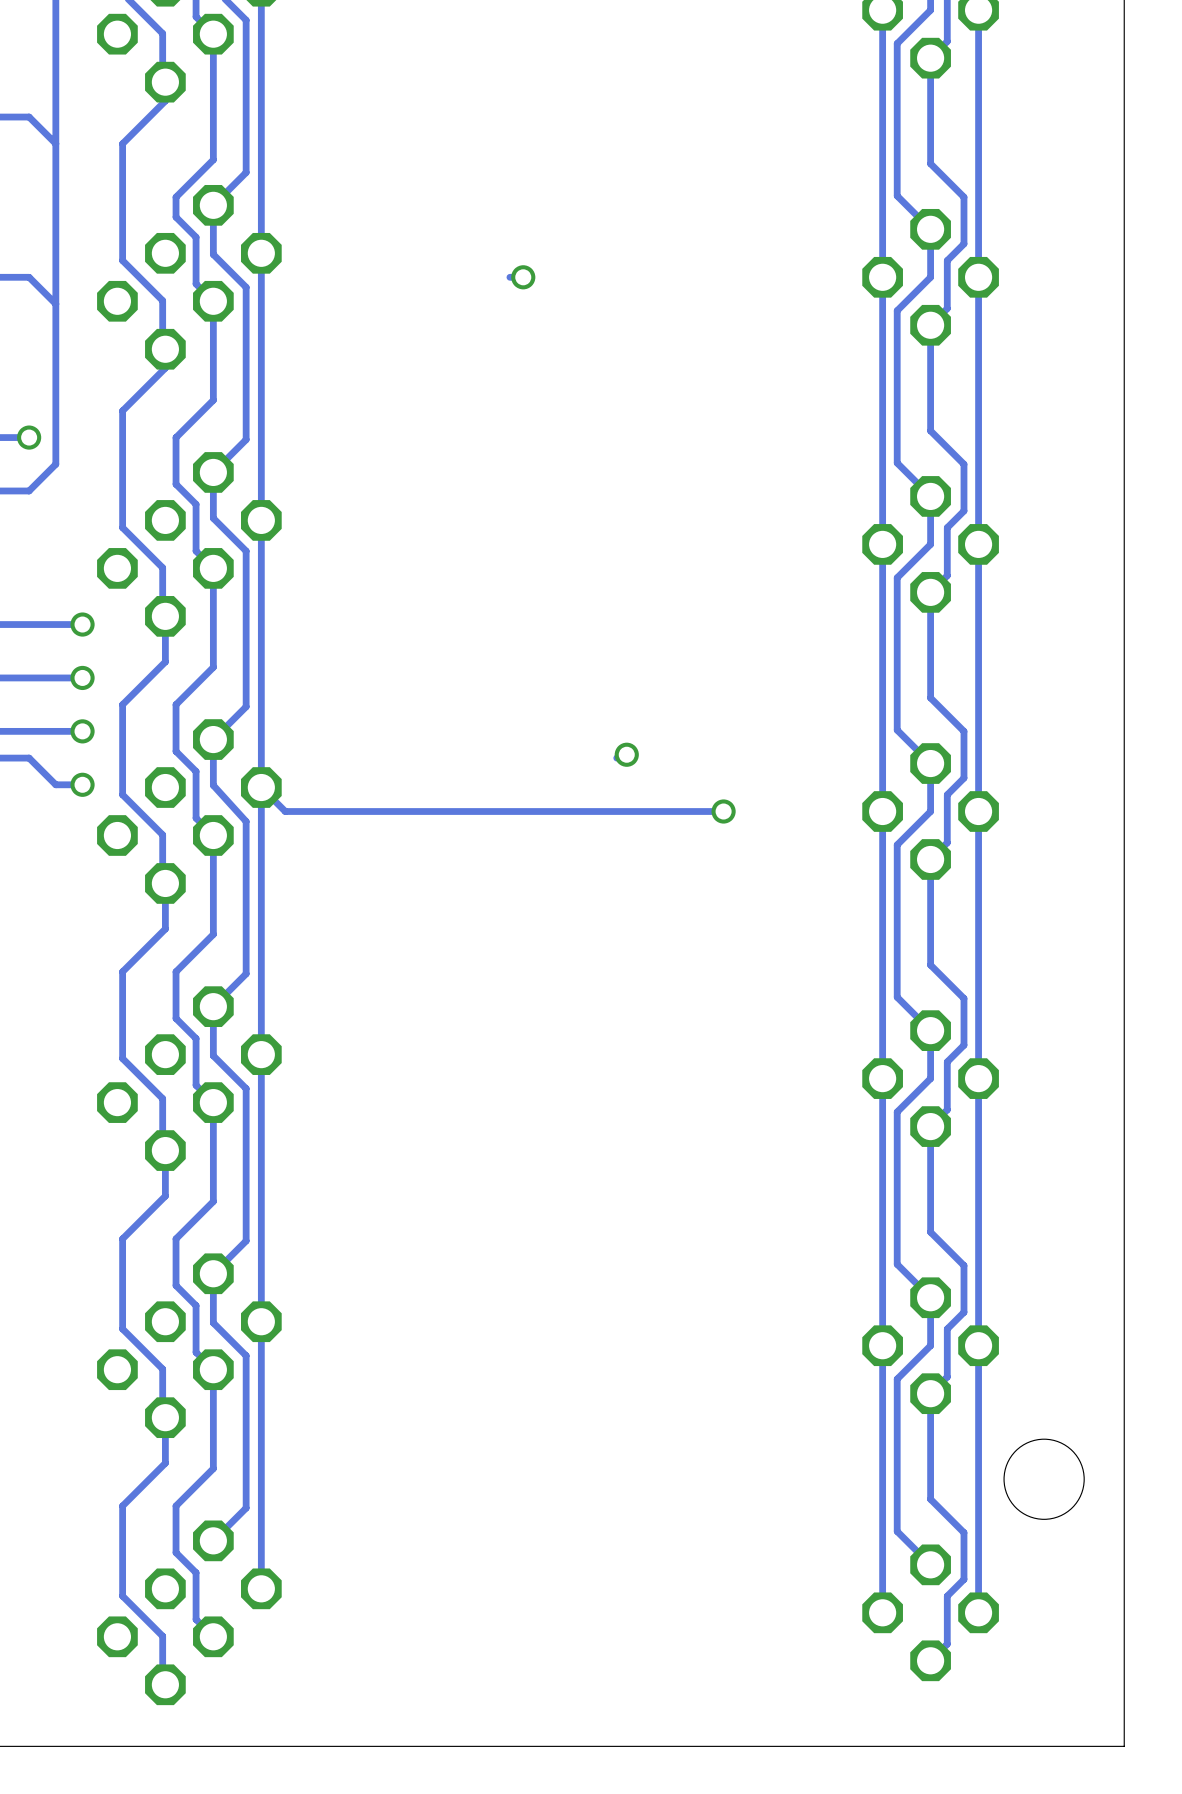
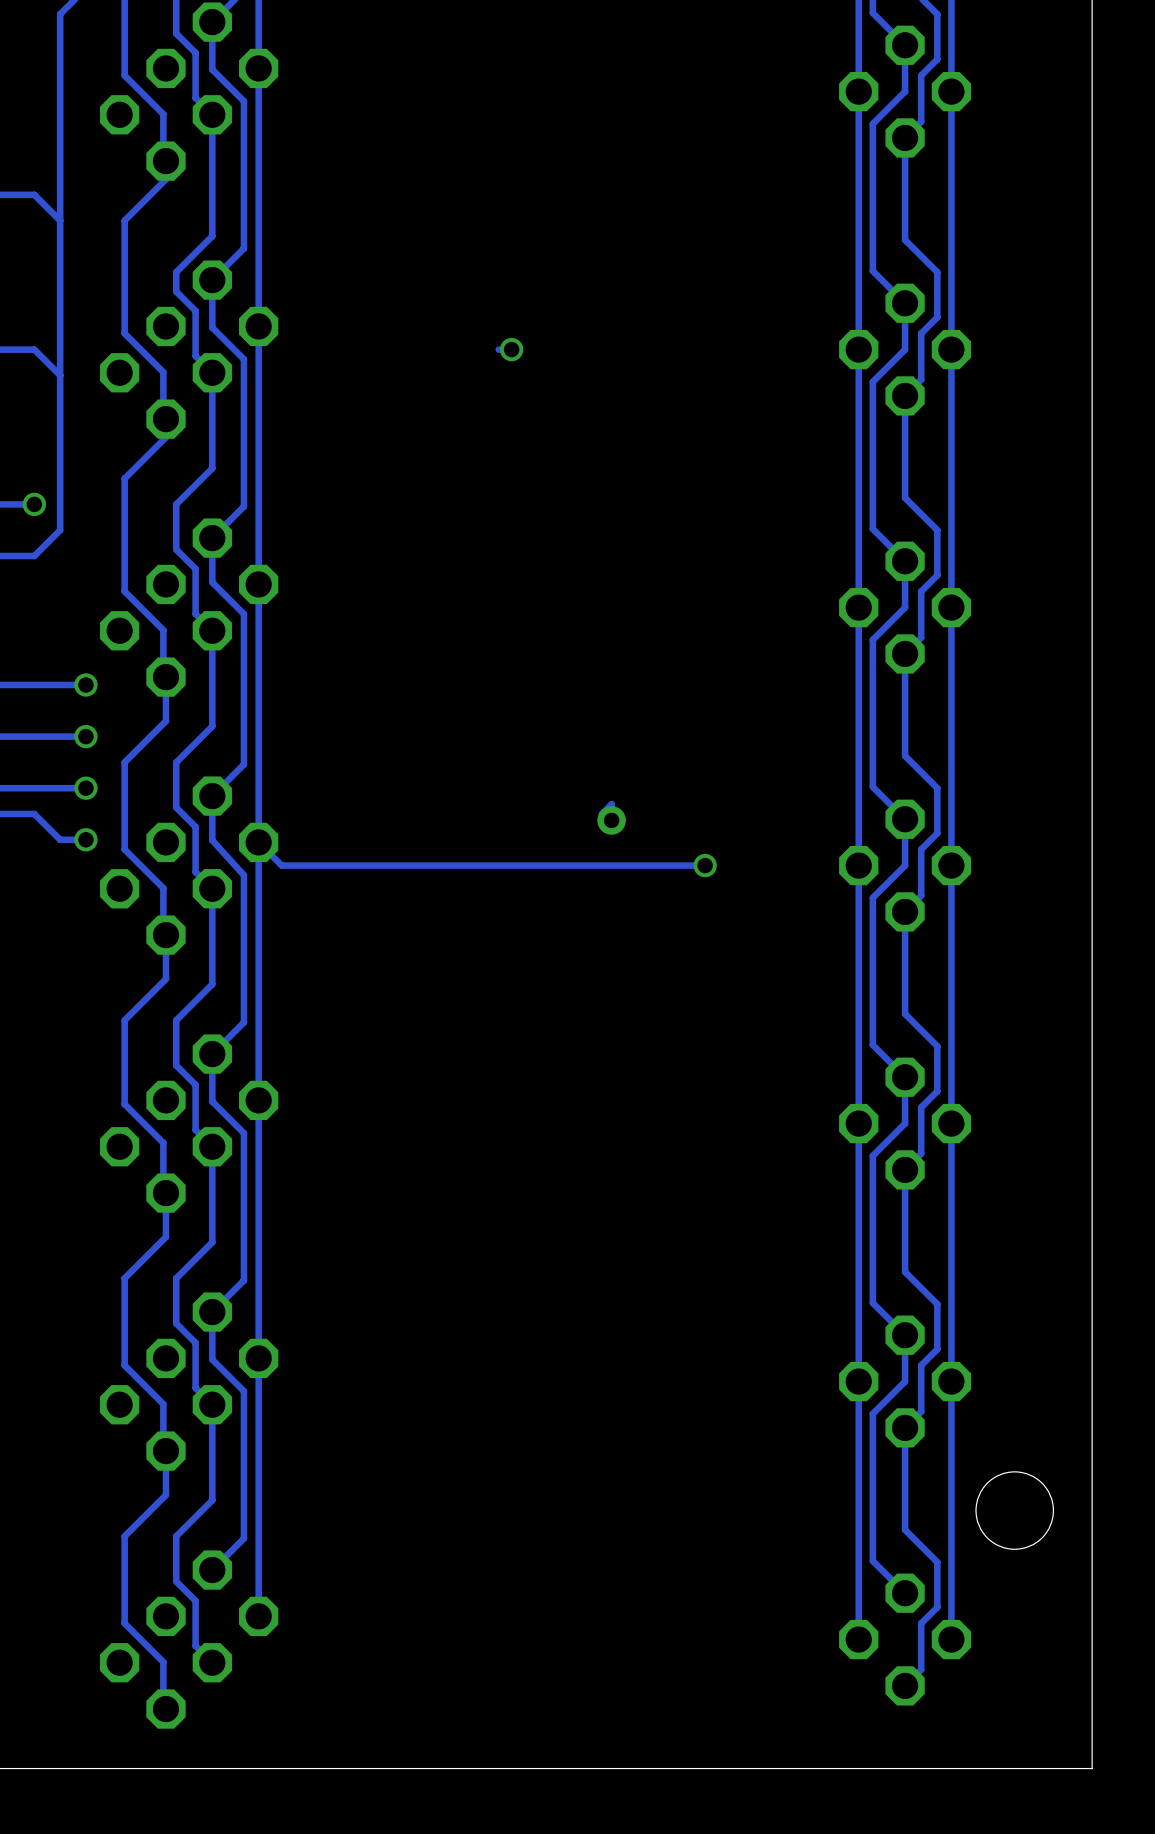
via size: [614, 742, 639, 767] -> [597, 806, 626, 835]

